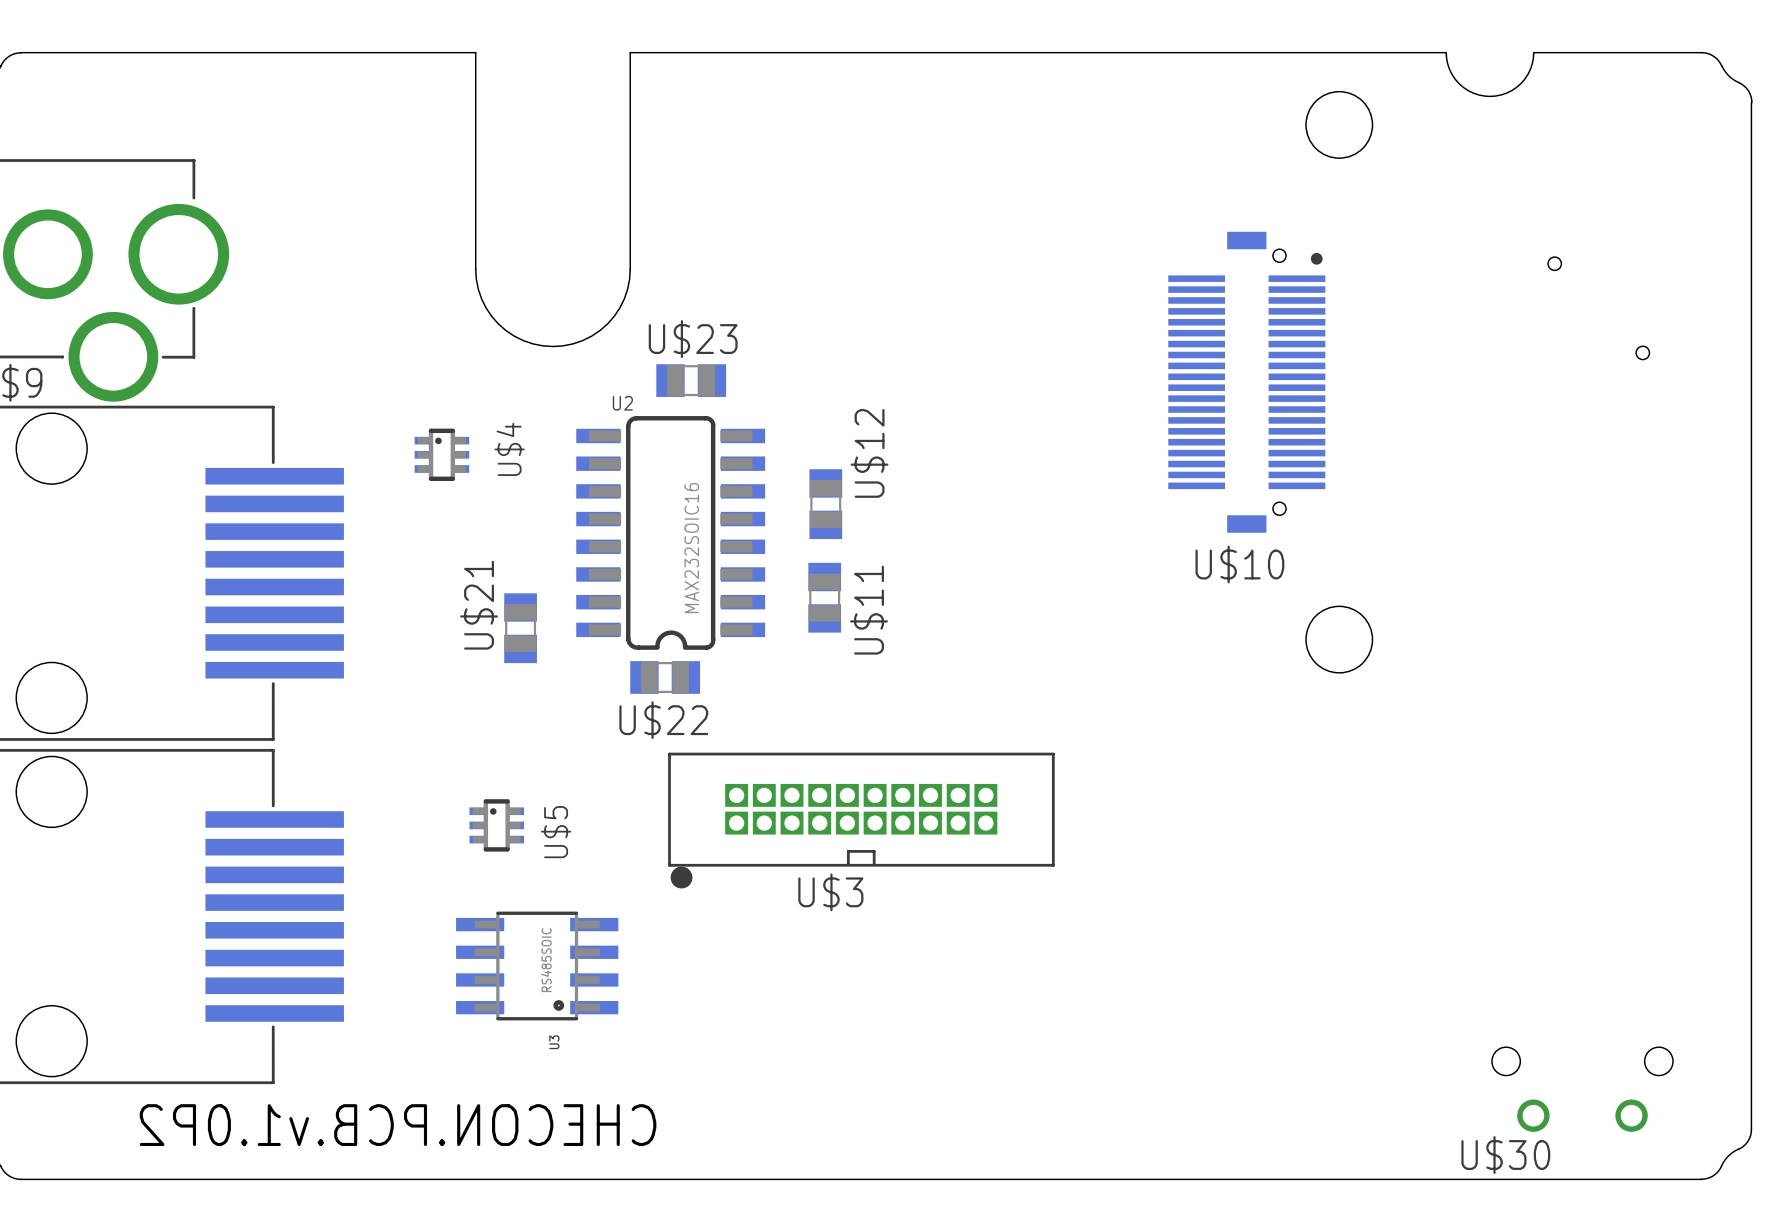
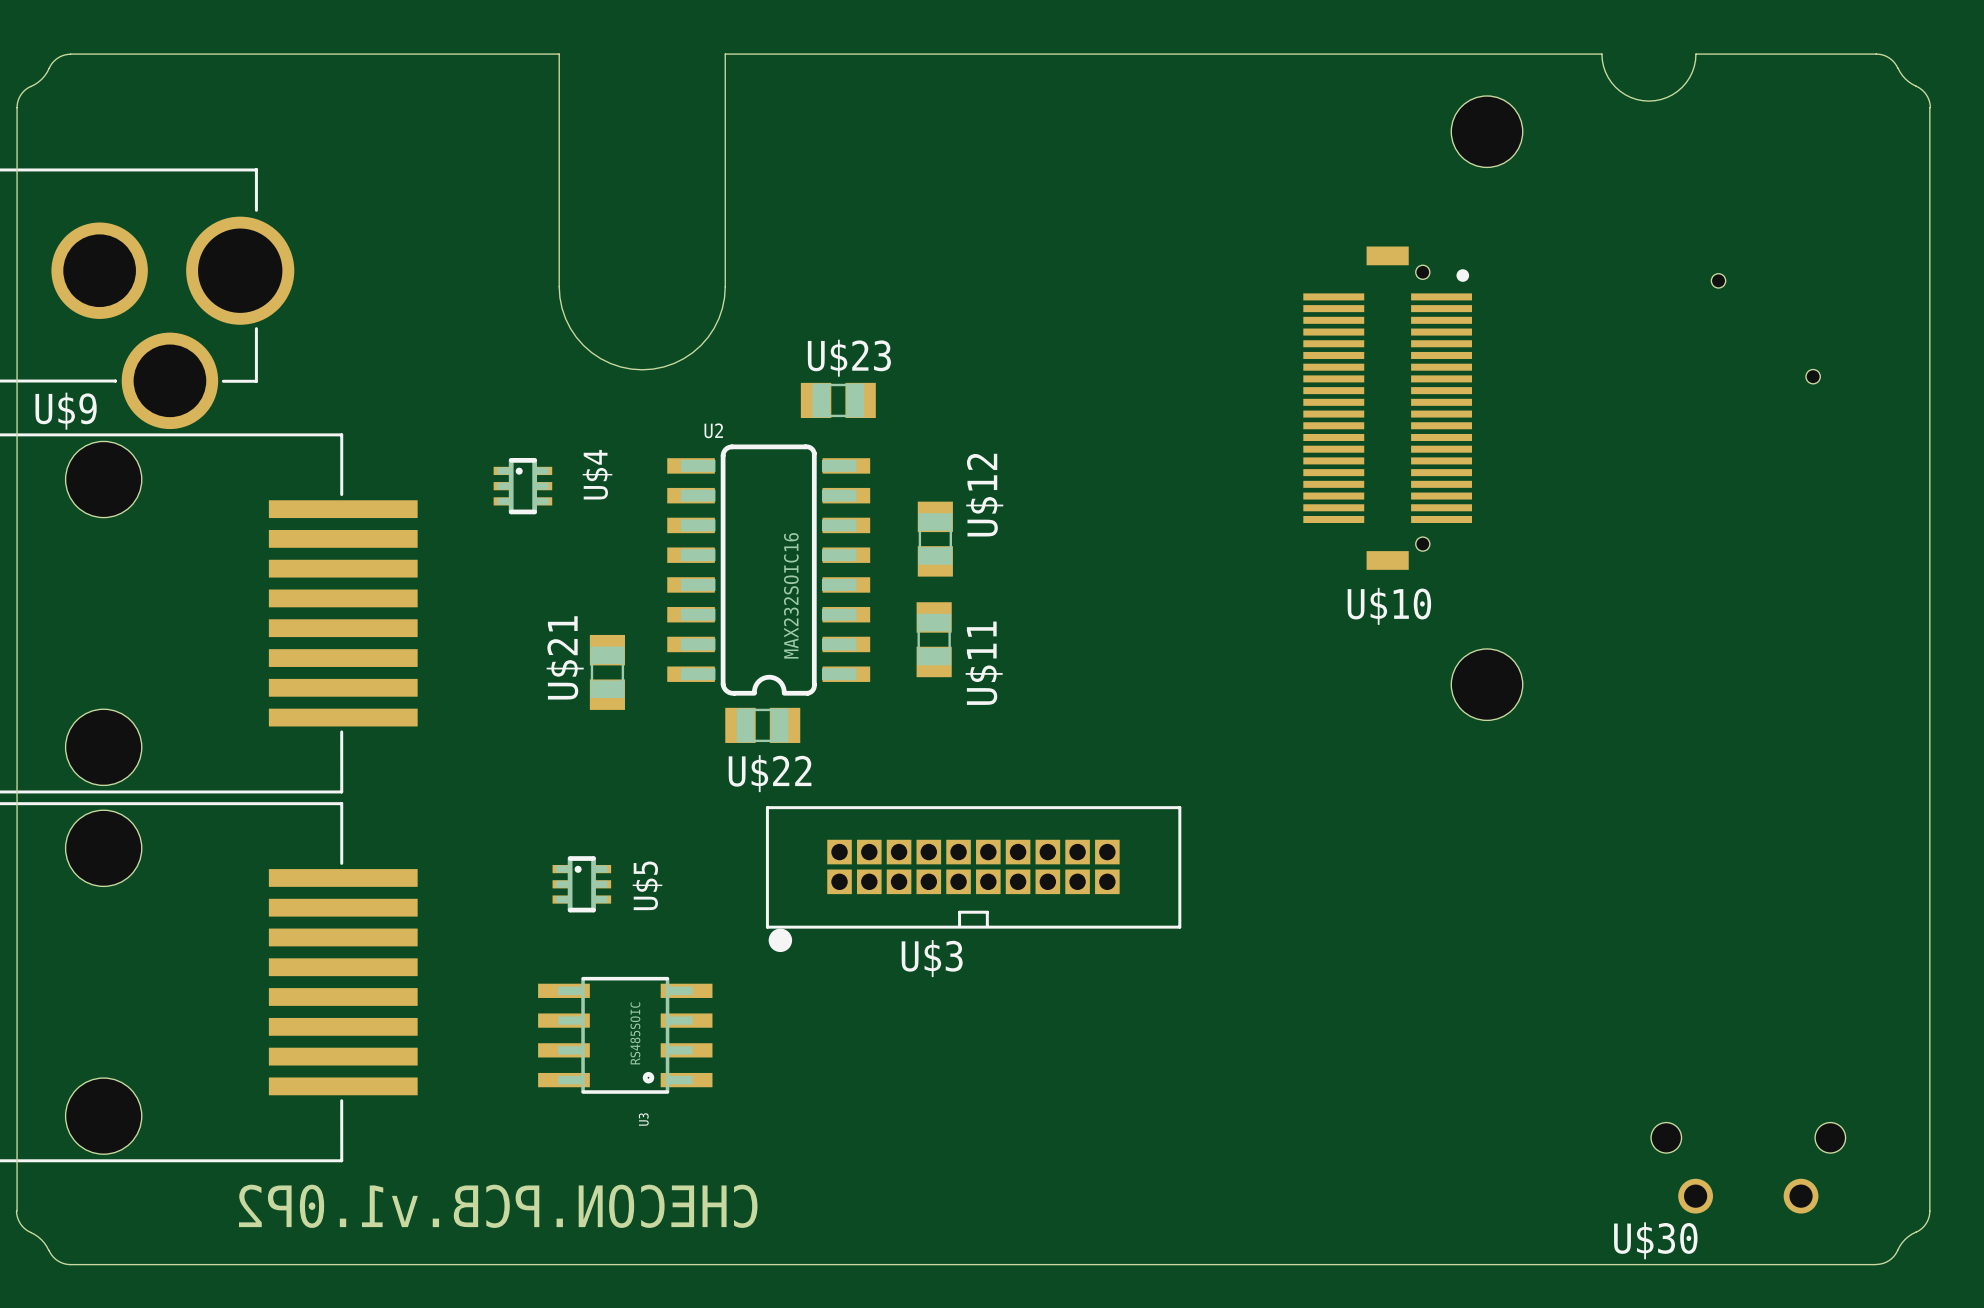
U$23 position: (691, 380) -> (838, 400)

